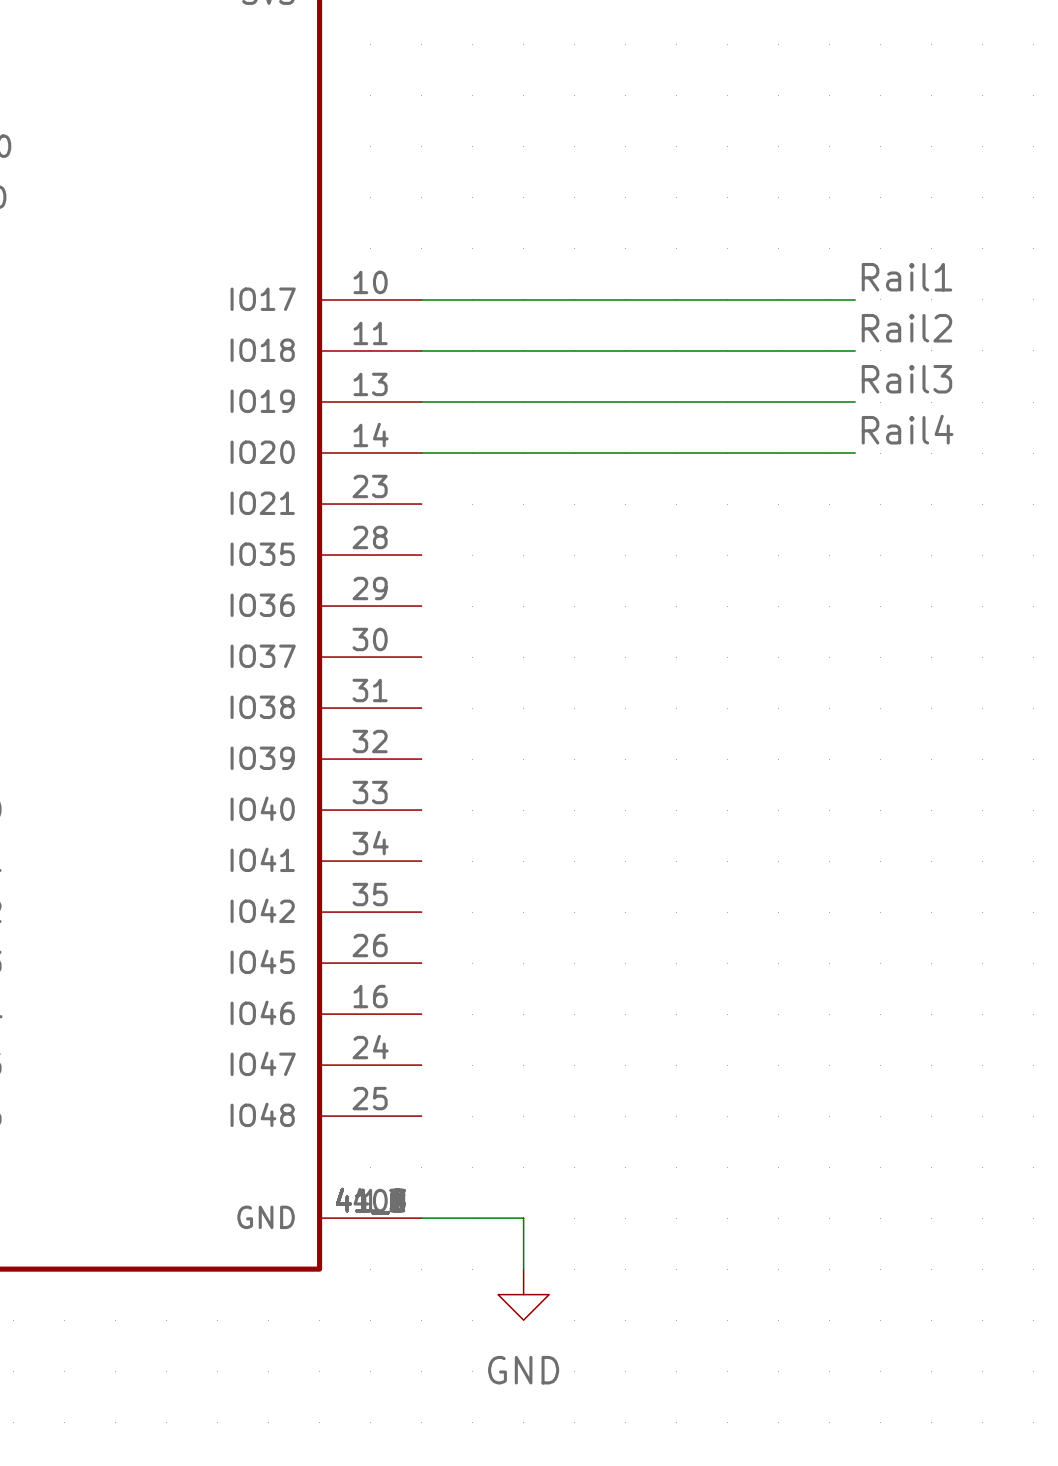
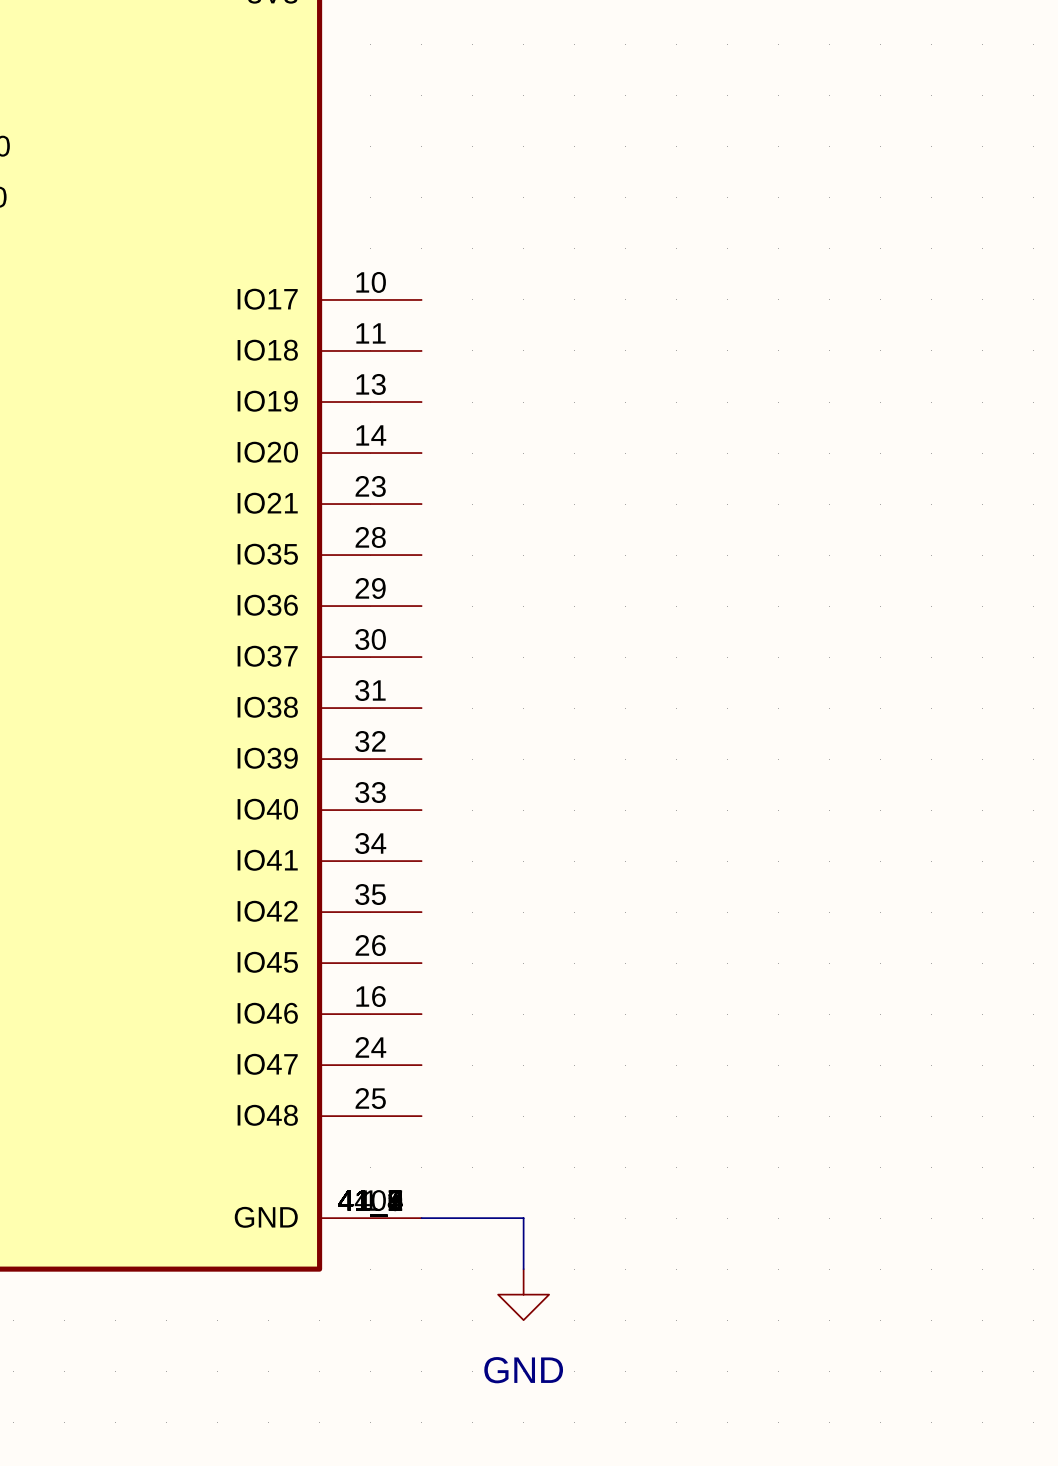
label: Rail1 (906, 277) -> none
wire: (421, 299) (855, 299) -> none
label: Rail2 (906, 328) -> none
wire: (421, 350) (855, 350) -> none
label: Rail3 (906, 379) -> none
wire: (421, 402) (855, 402) -> none
label: Rail4 (907, 429) -> none
wire: (421, 453) (855, 453) -> none

